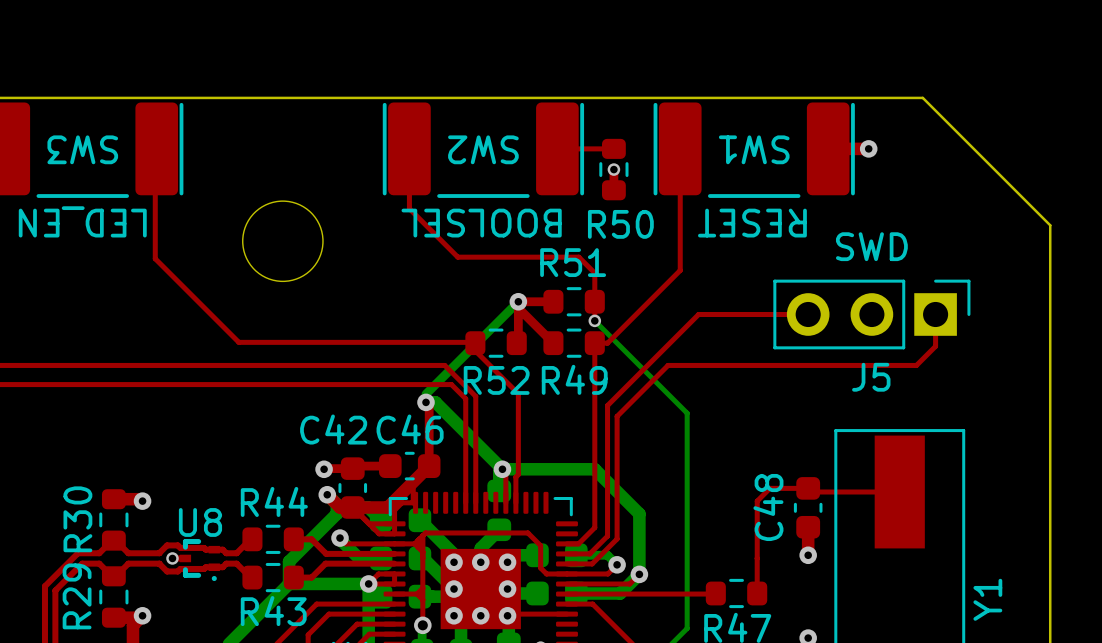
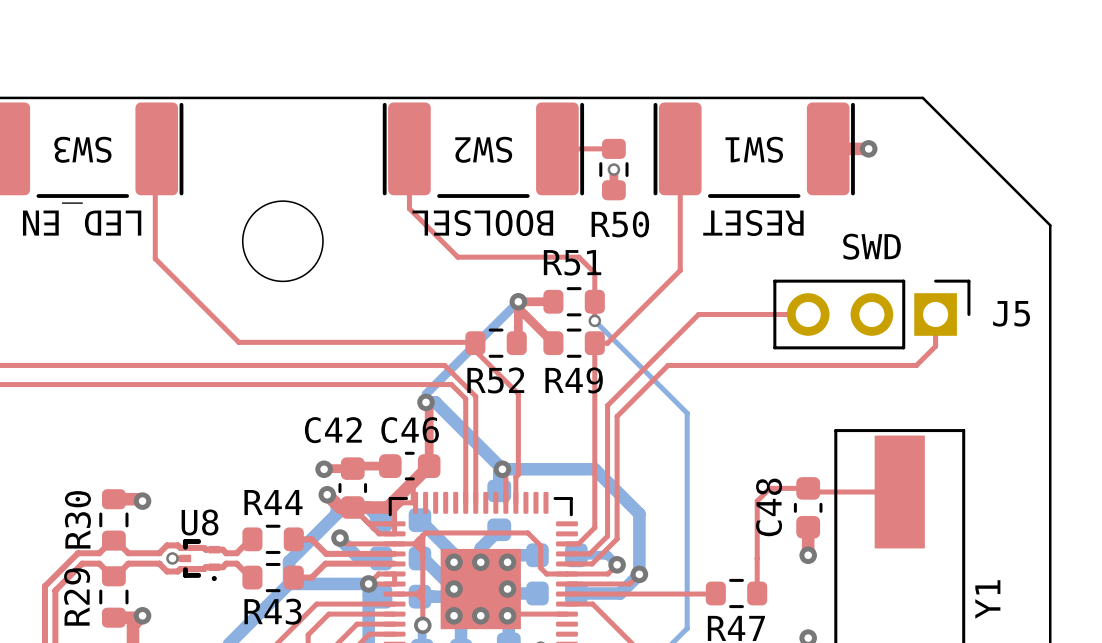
J5 name position: J5 (871, 377) -> J5 (1011, 313)

